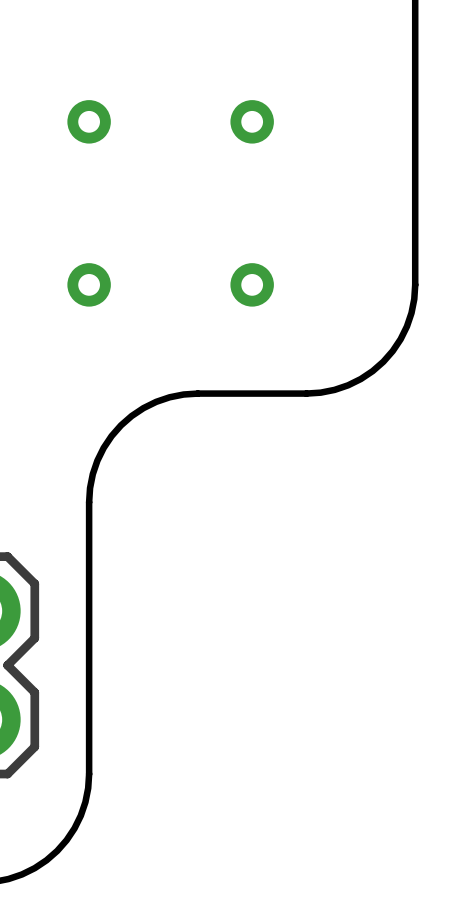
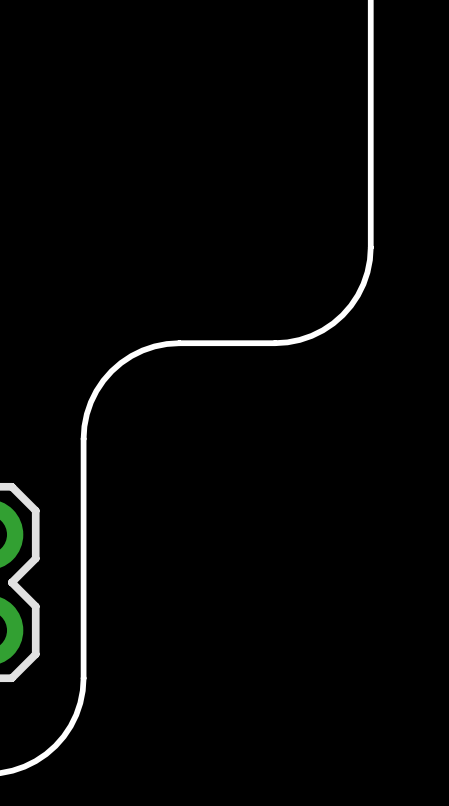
via: (89, 121) -> none
via: (252, 121) -> none
via: (89, 284) -> none
via: (252, 284) -> none

